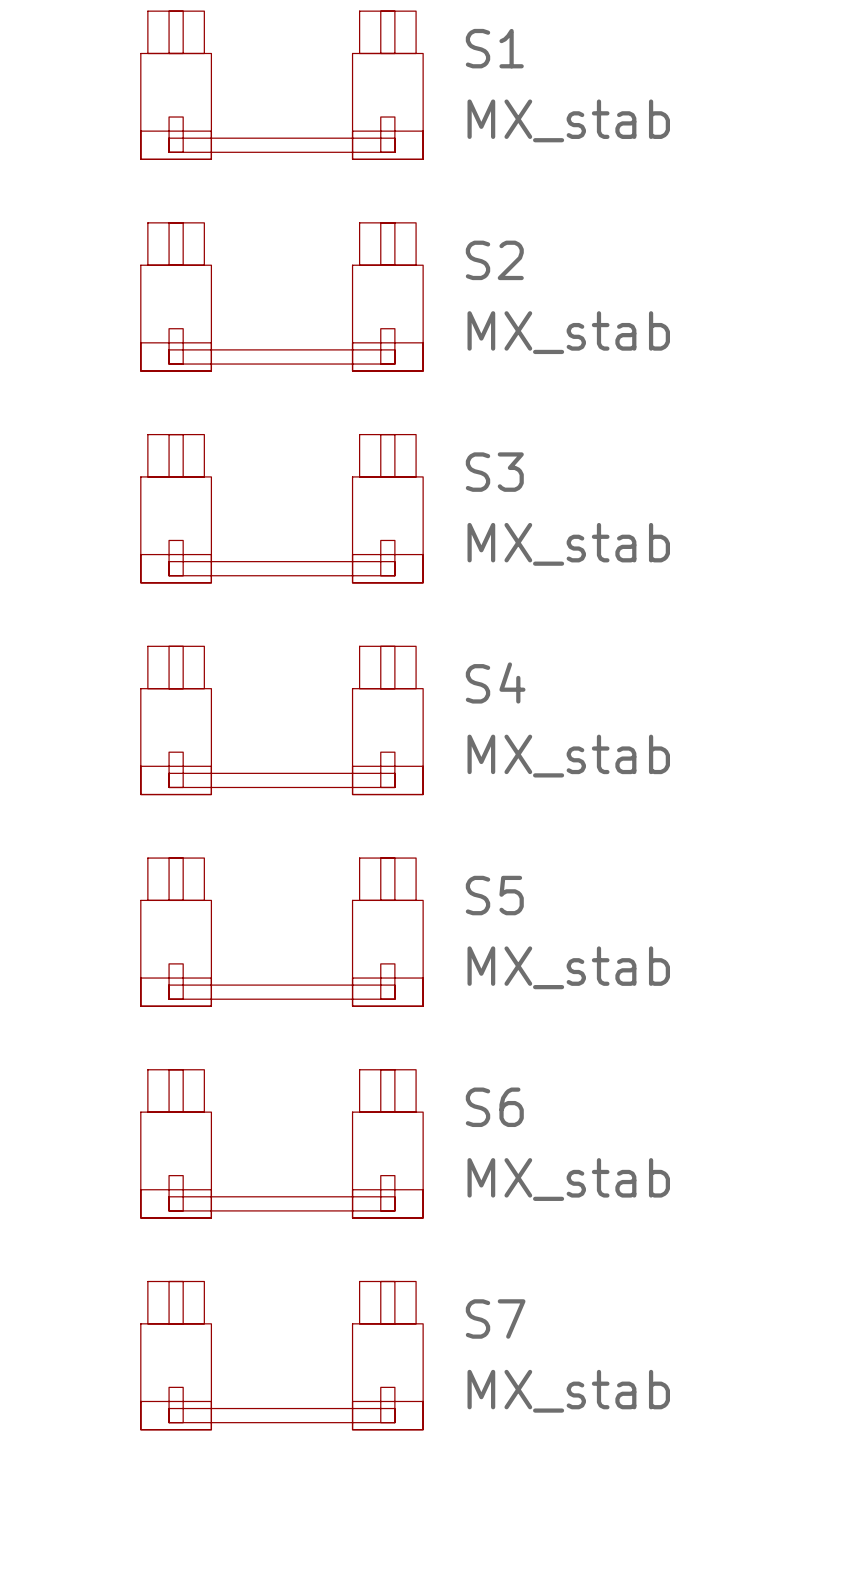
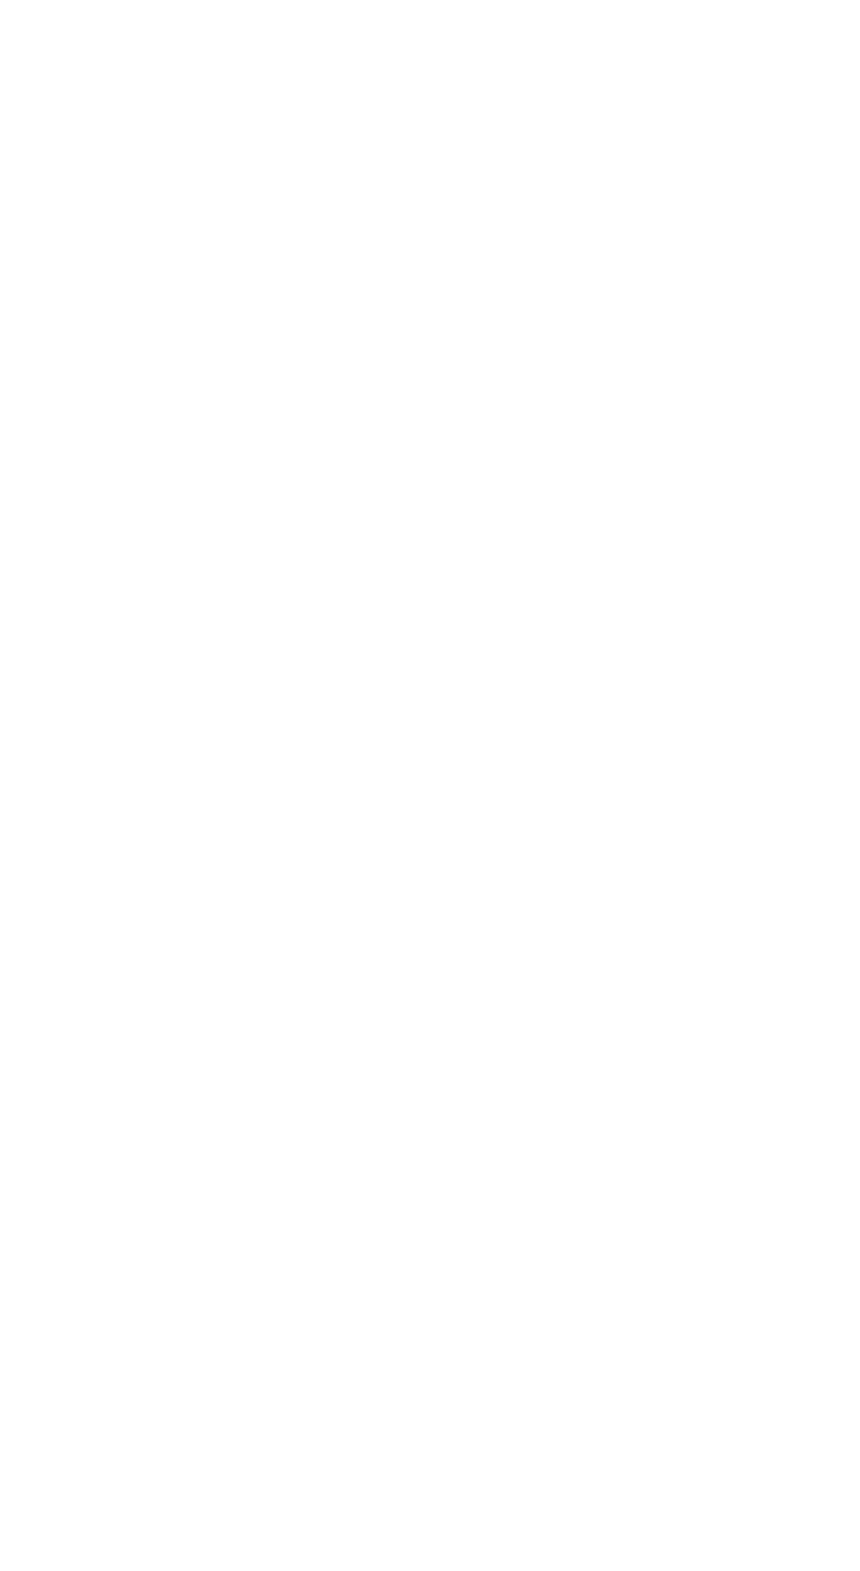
S1: MX_stab (281, 85) -> none
S2: MX_stab (281, 296) -> none
S3: MX_stab (281, 508) -> none
S4: MX_stab (281, 720) -> none
S5: MX_stab (281, 932) -> none
S6: MX_stab (281, 1143) -> none
S7: MX_stab (281, 1355) -> none

